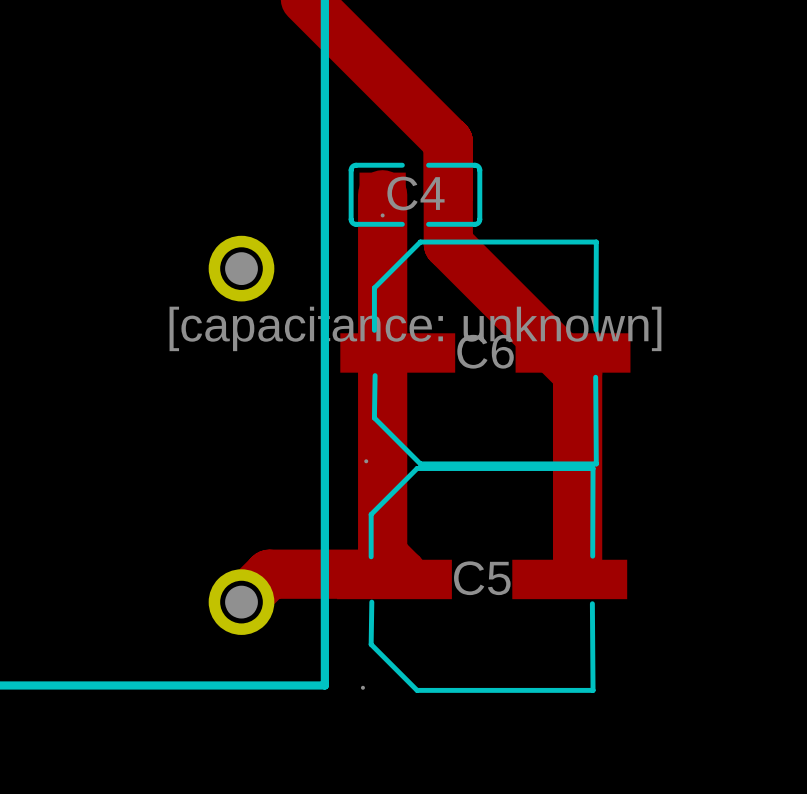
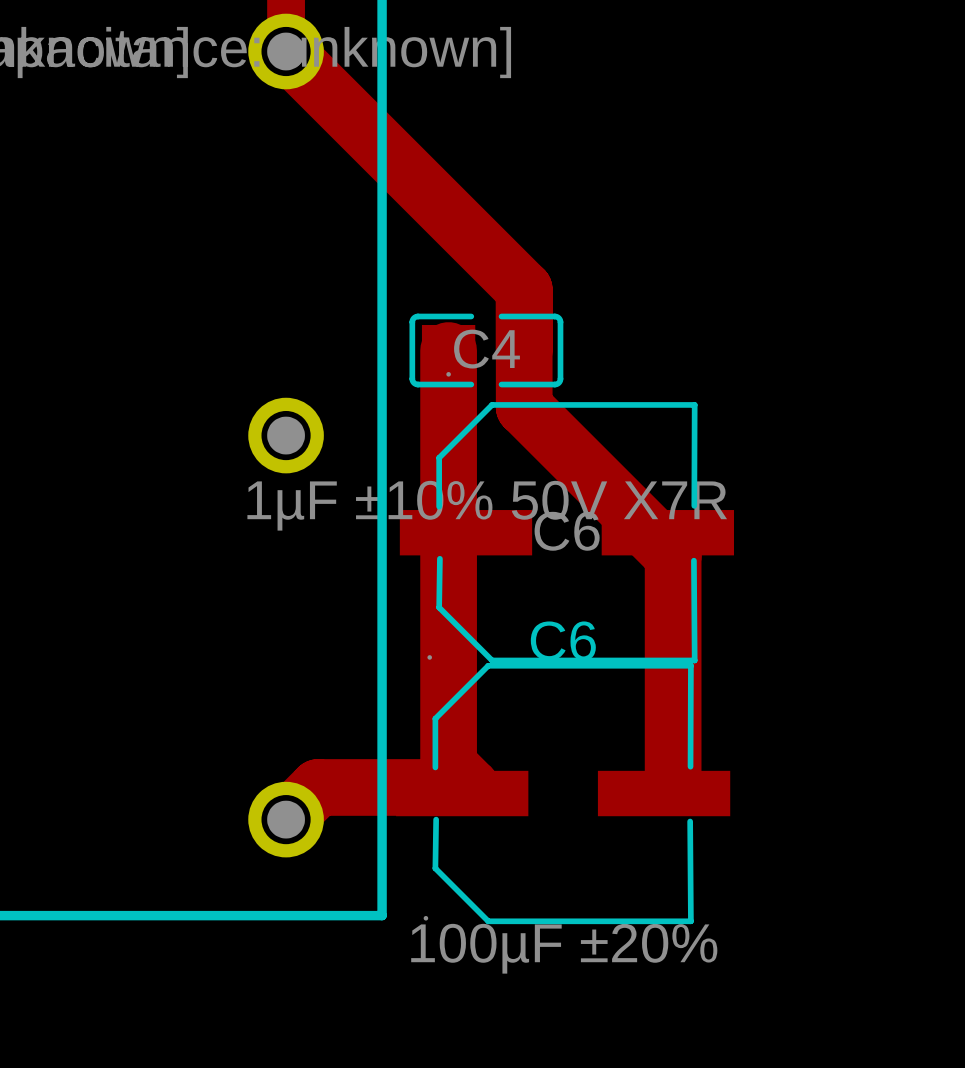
C4 value: [capacitance: unknown] (415, 328) -> 1µF ±10% 50V X7R (487, 505)
C5 name: C5 (482, 578) -> C6 (563, 640)
C5 value: none -> 100µF ±20% (564, 948)

